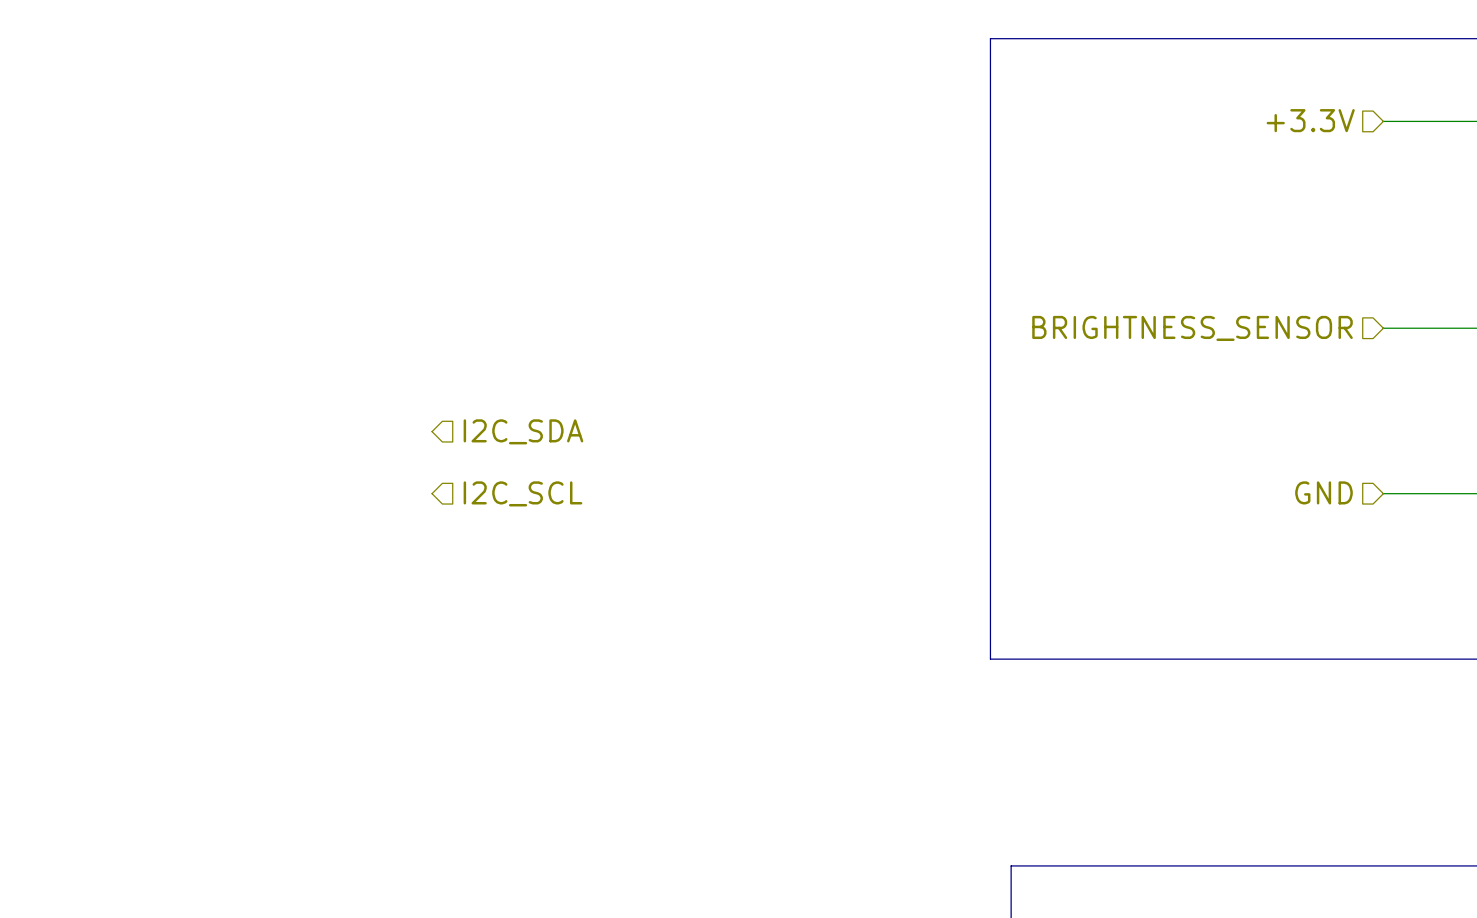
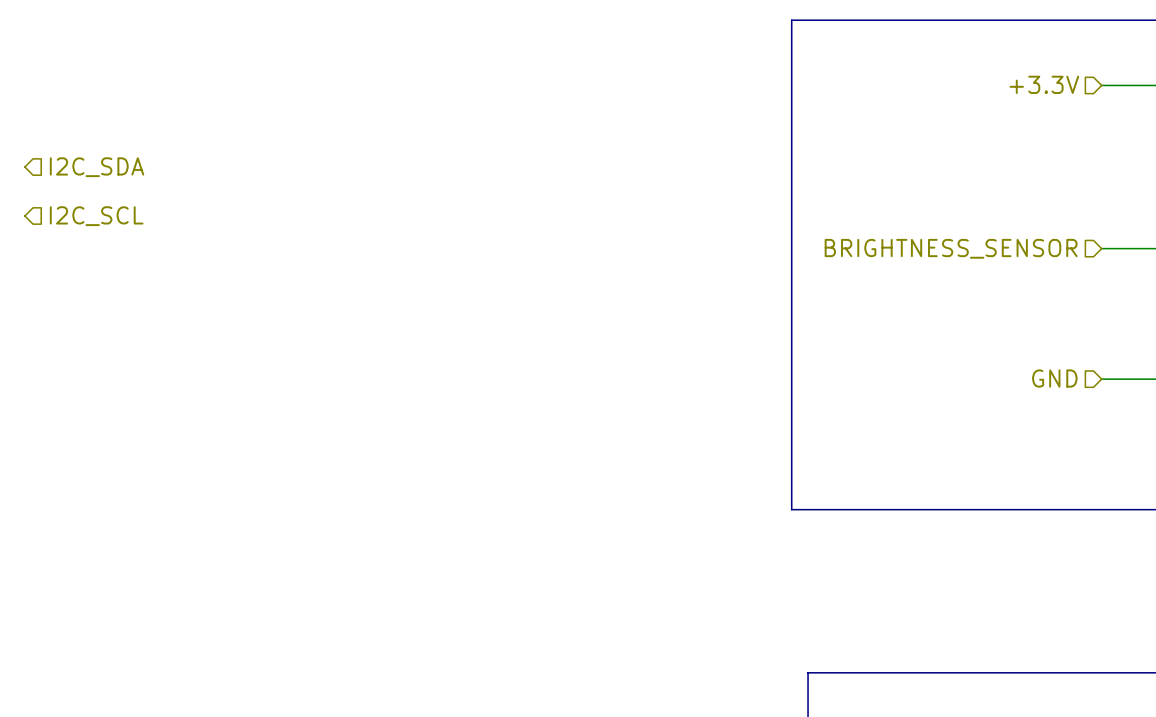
hierarchical label: none -> I2C_SDA (97, 167)
hierarchical label: none -> I2C_SCL (96, 216)
hierarchical label: I2C_SDA (523, 431) -> none
hierarchical label: I2C_SCL (522, 493) -> none

